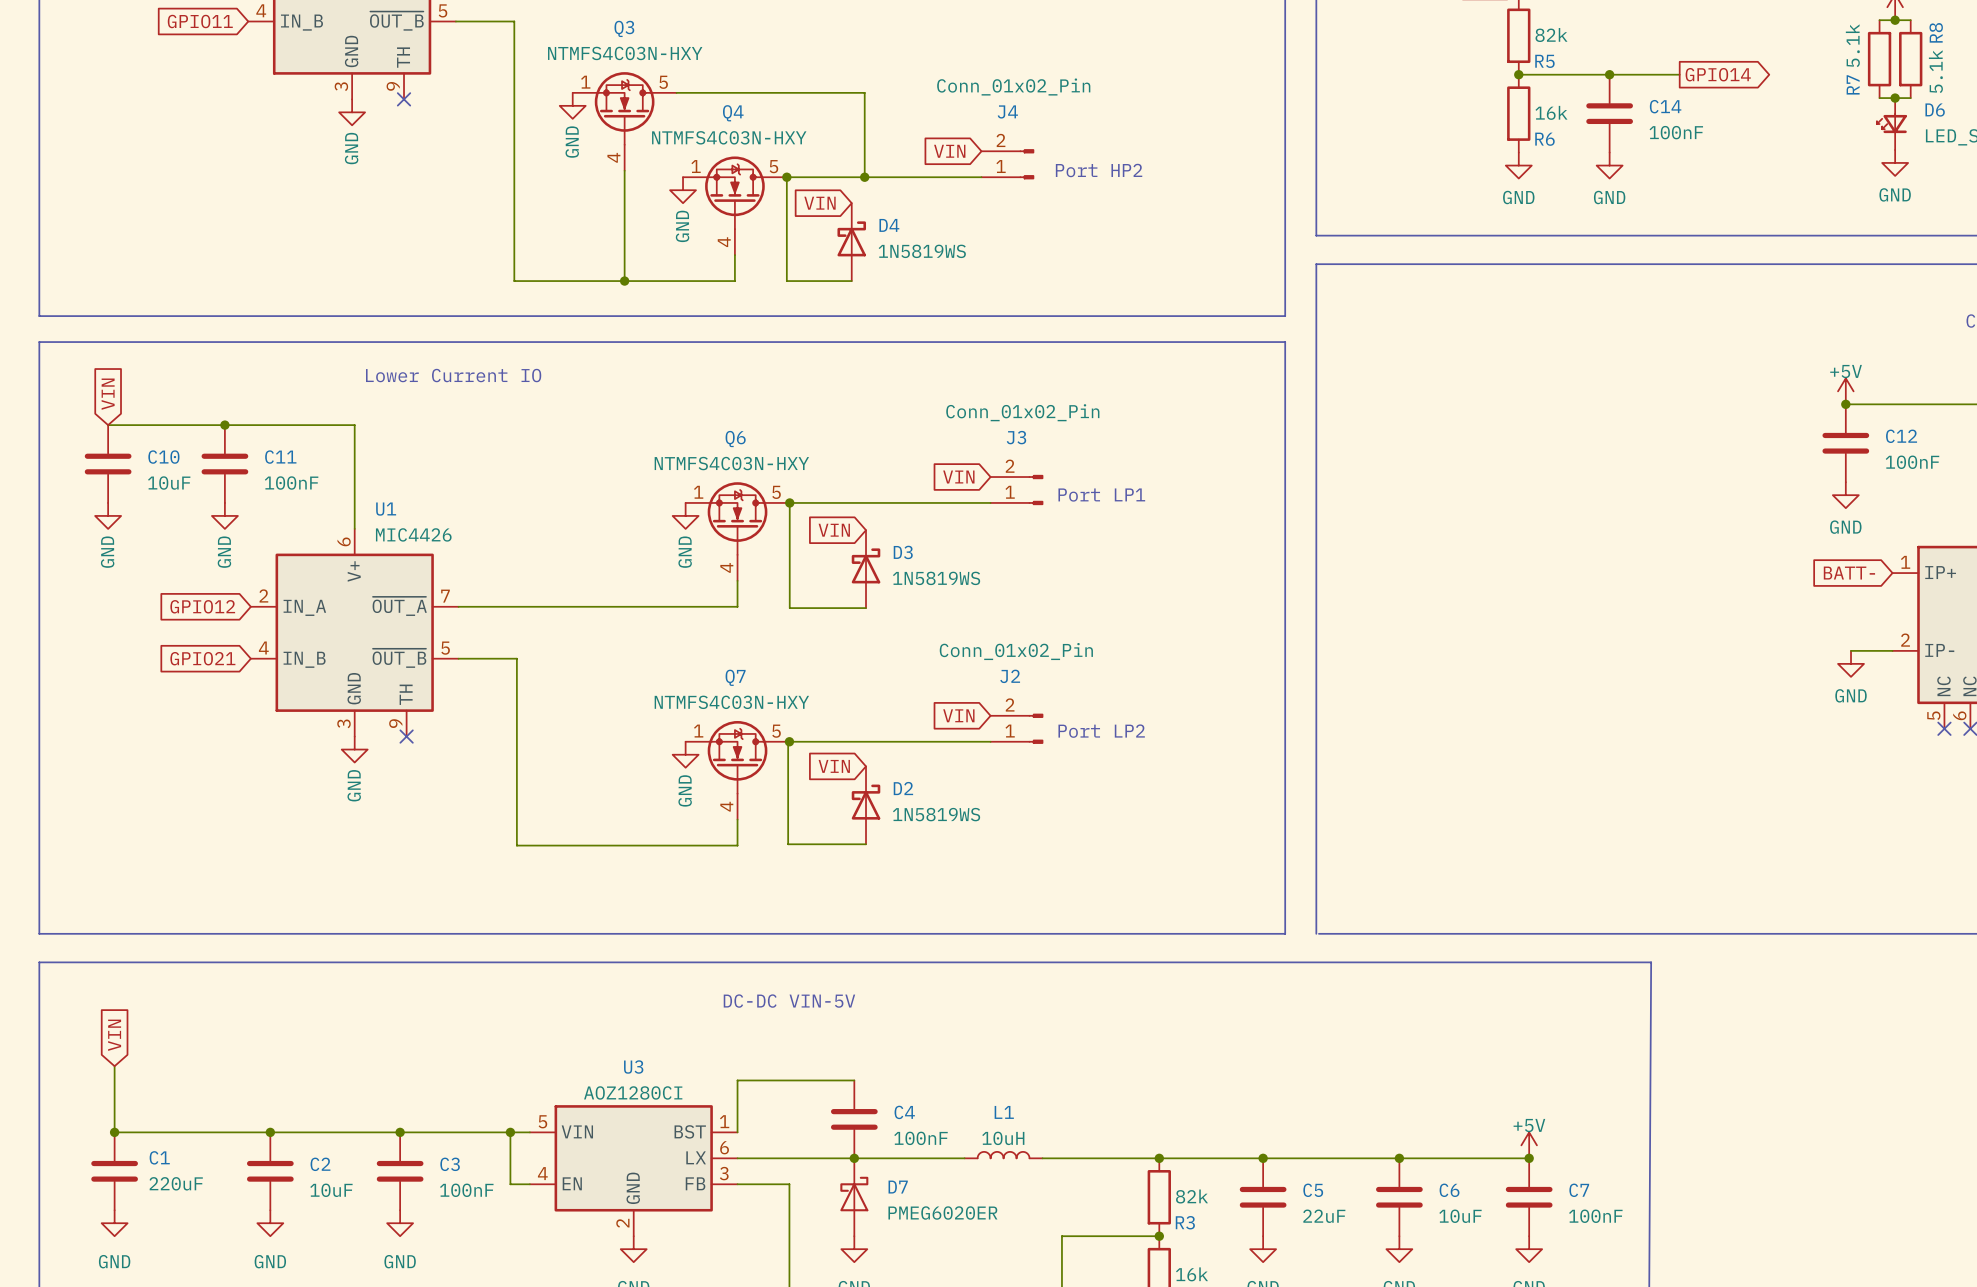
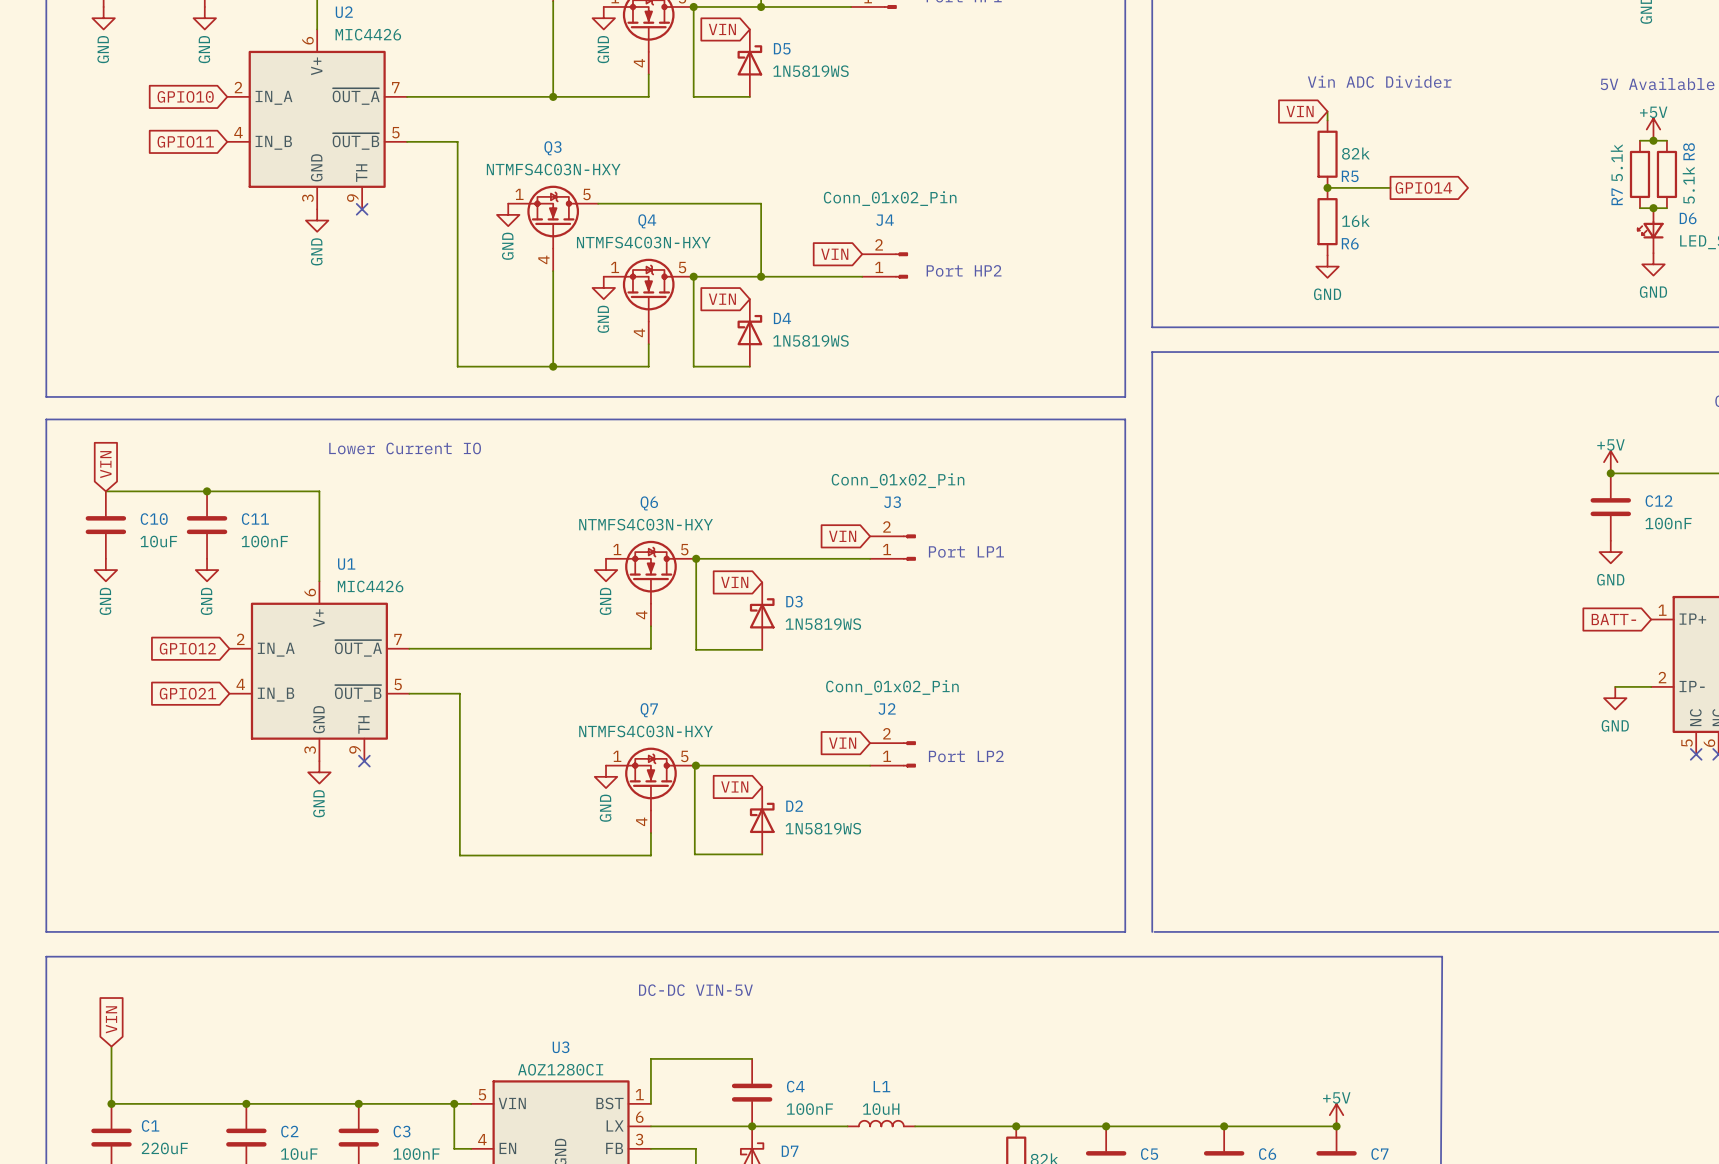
wire: (1591, 74) (1679, 74) -> none
junction: (1609, 74) -> none
global label position: GPIO14 (1718, 74) -> GPIO14 (1423, 187)
C14: 100nF (1609, 113) -> none
power symbol: GND (1609, 165) -> none

